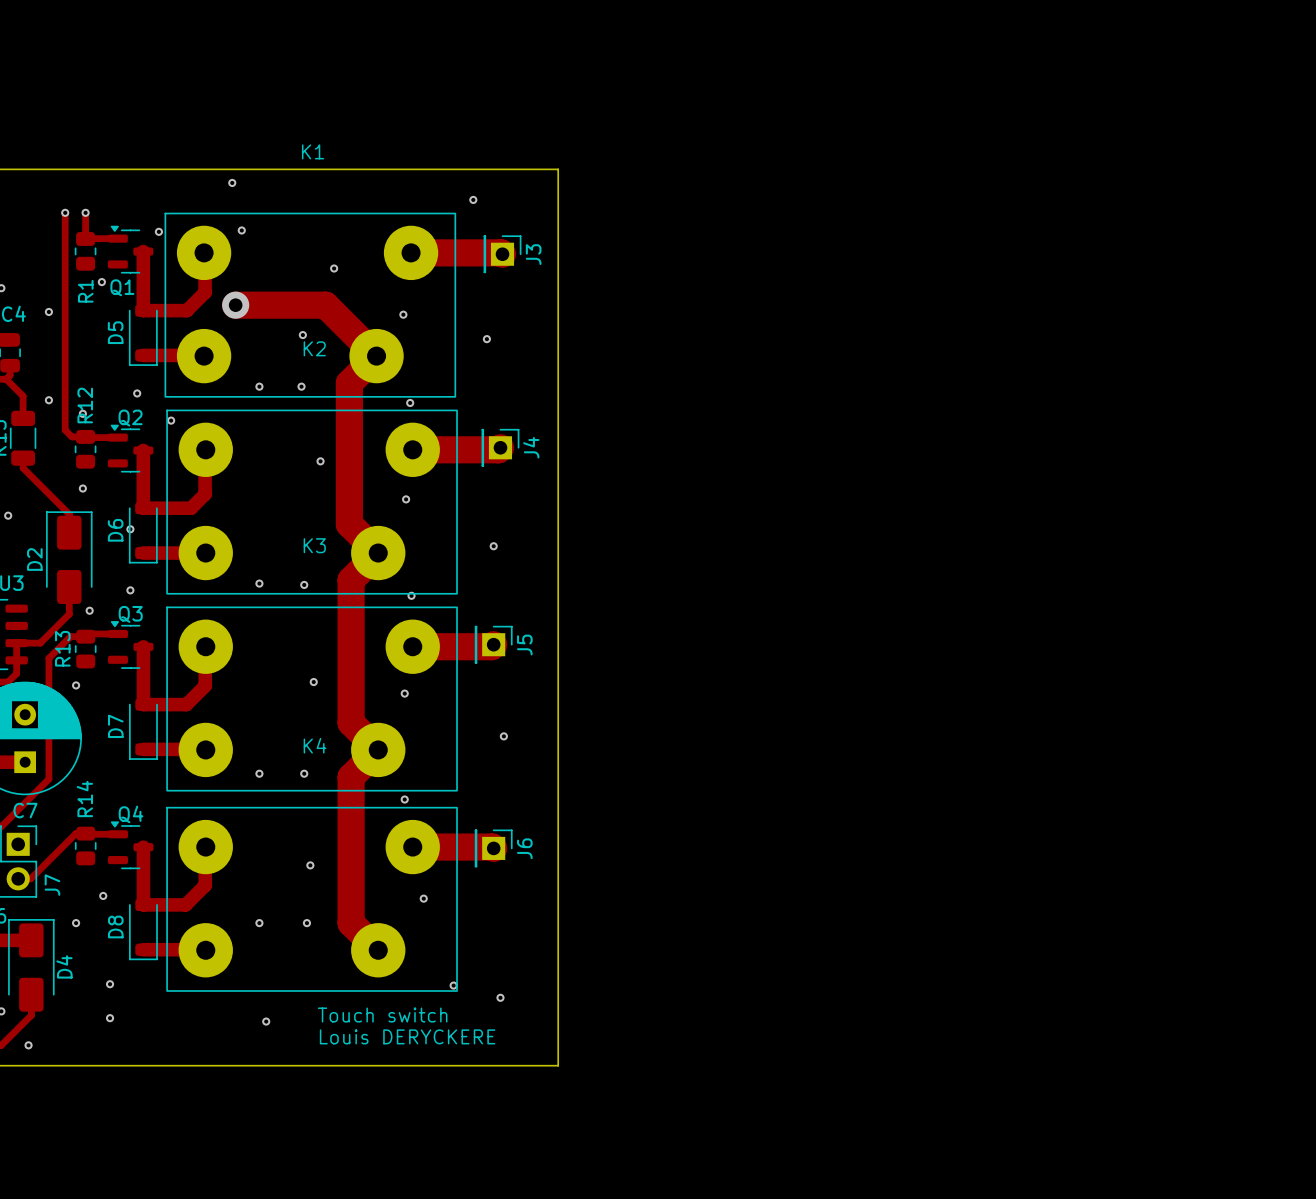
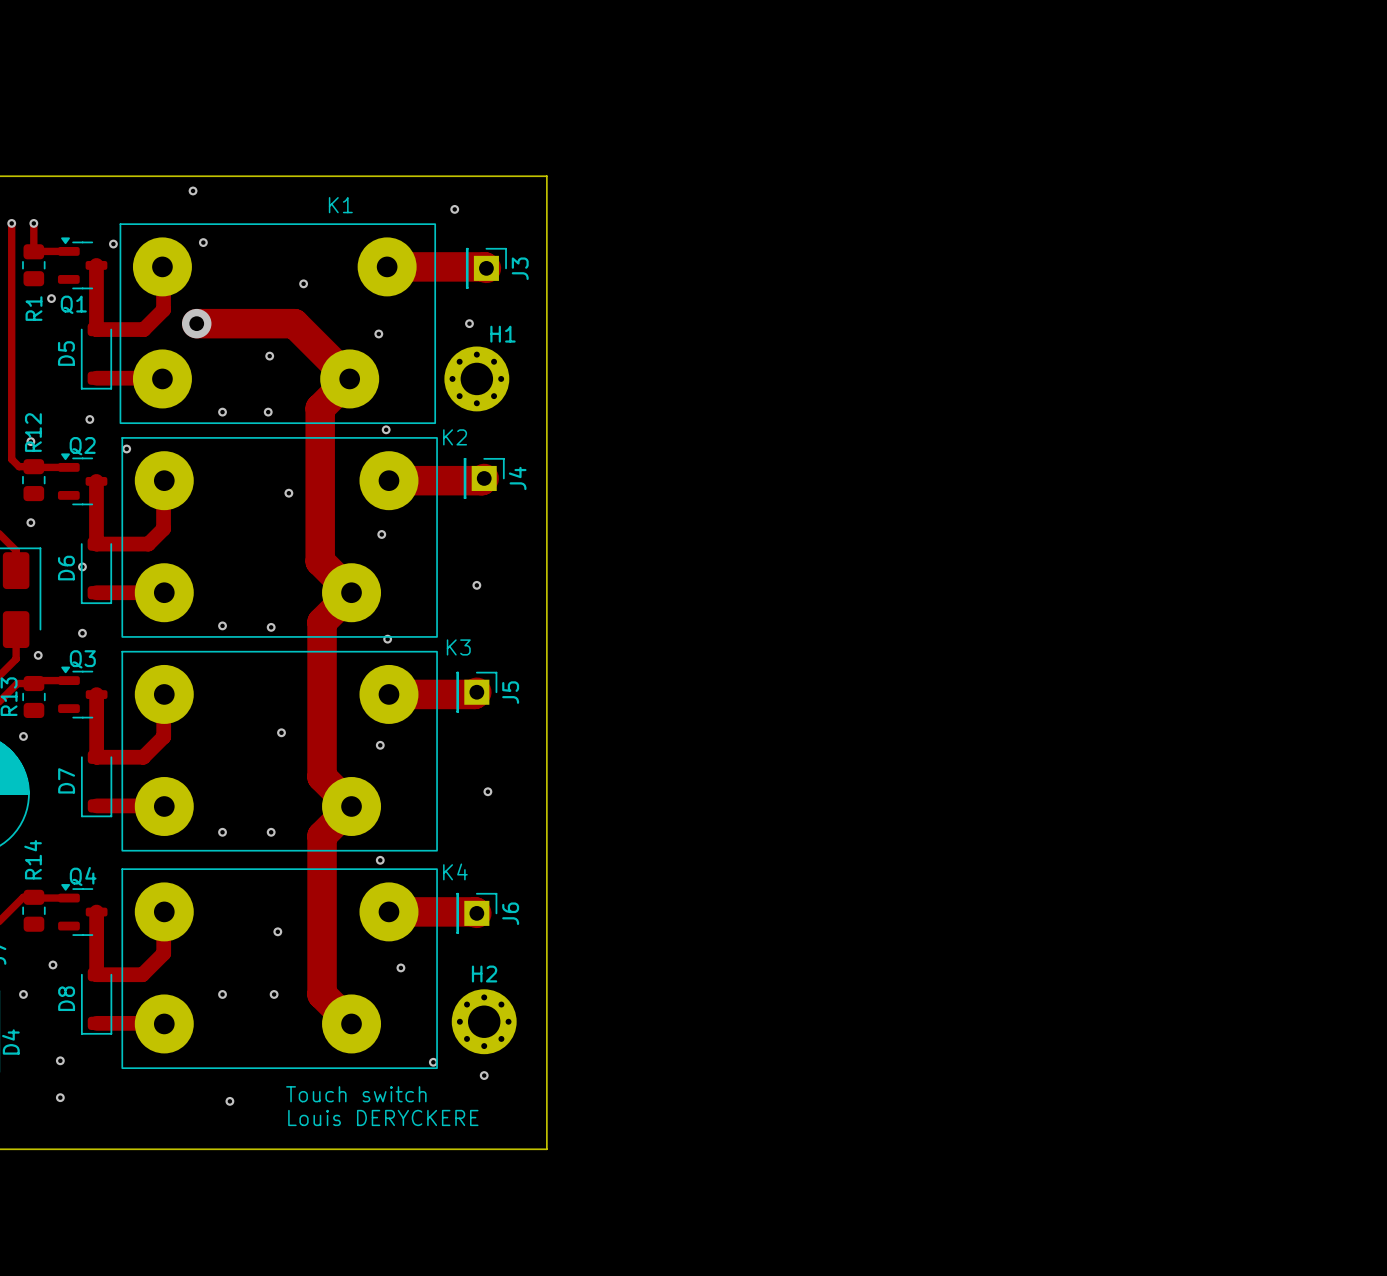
K1 name position: K1 (313, 151) -> K1 (340, 205)
via position: (486, 339) -> (469, 323)
K2 name position: K2 (314, 348) -> K2 (455, 437)
H1: none -> (476, 378)
K3 name position: K3 (314, 545) -> K3 (458, 647)
K4 name position: K4 (315, 745) -> K4 (455, 871)
H2: none -> (484, 1021)

